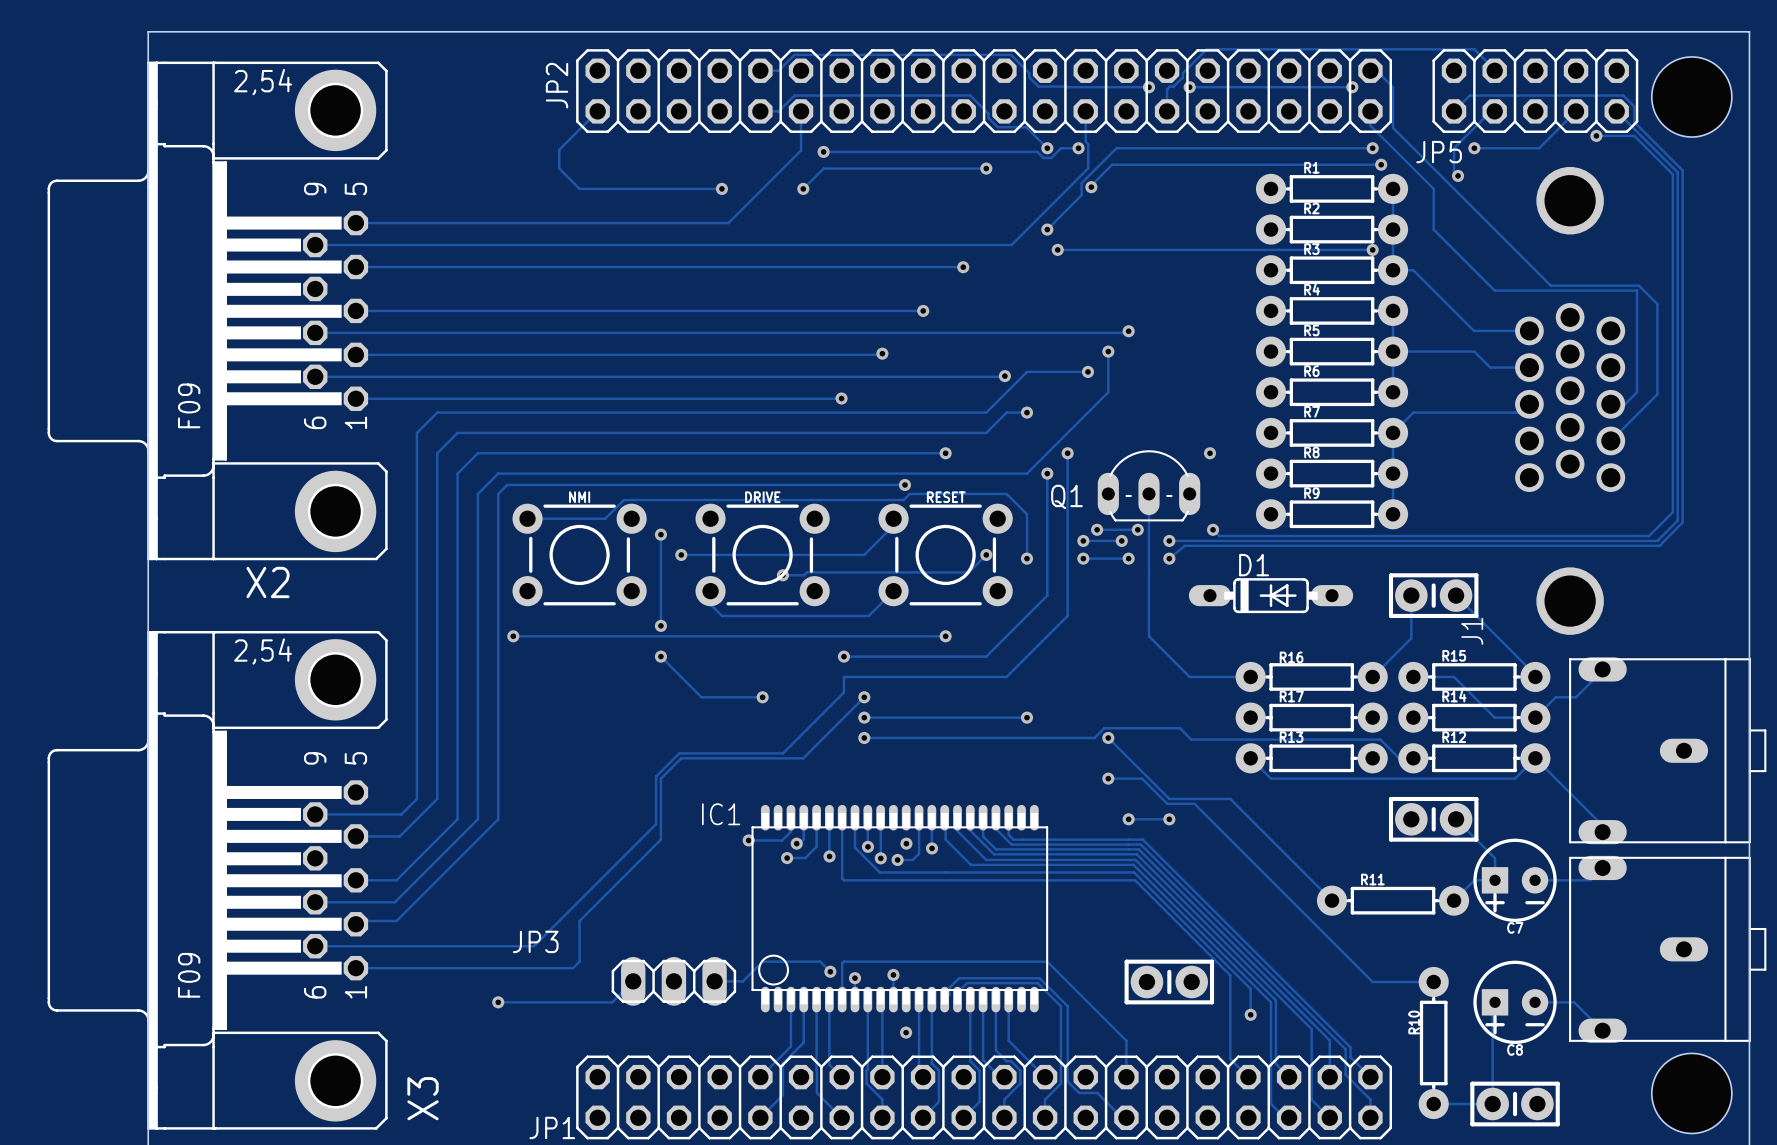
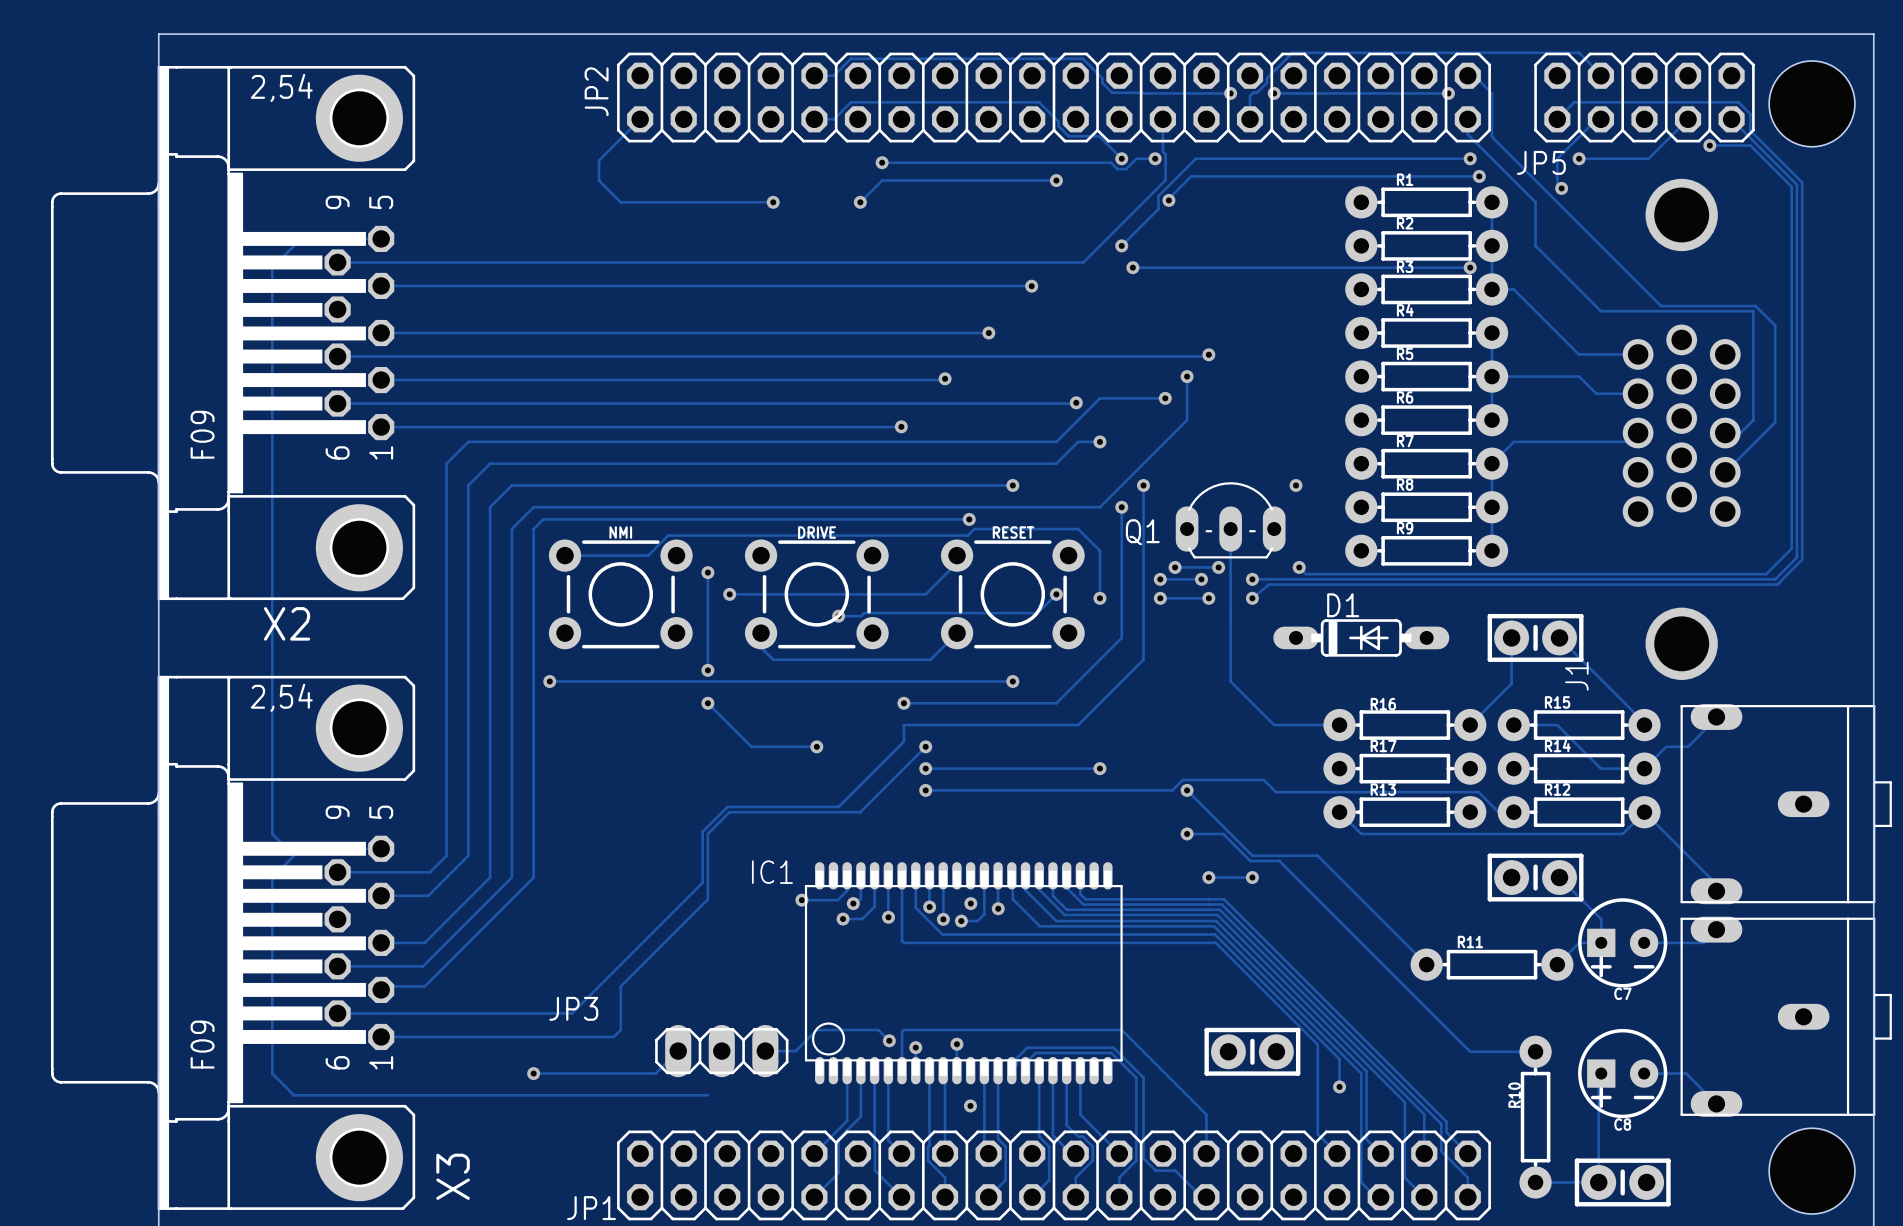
track: (801, 111) (801, 150) (728, 223) (355, 223) -> (381, 848) (287, 848) (272, 833) (272, 267) (301, 238) (381, 238)
track: none -> (301, 848) (272, 877) (272, 1073) (294, 1095) (707, 1095)

